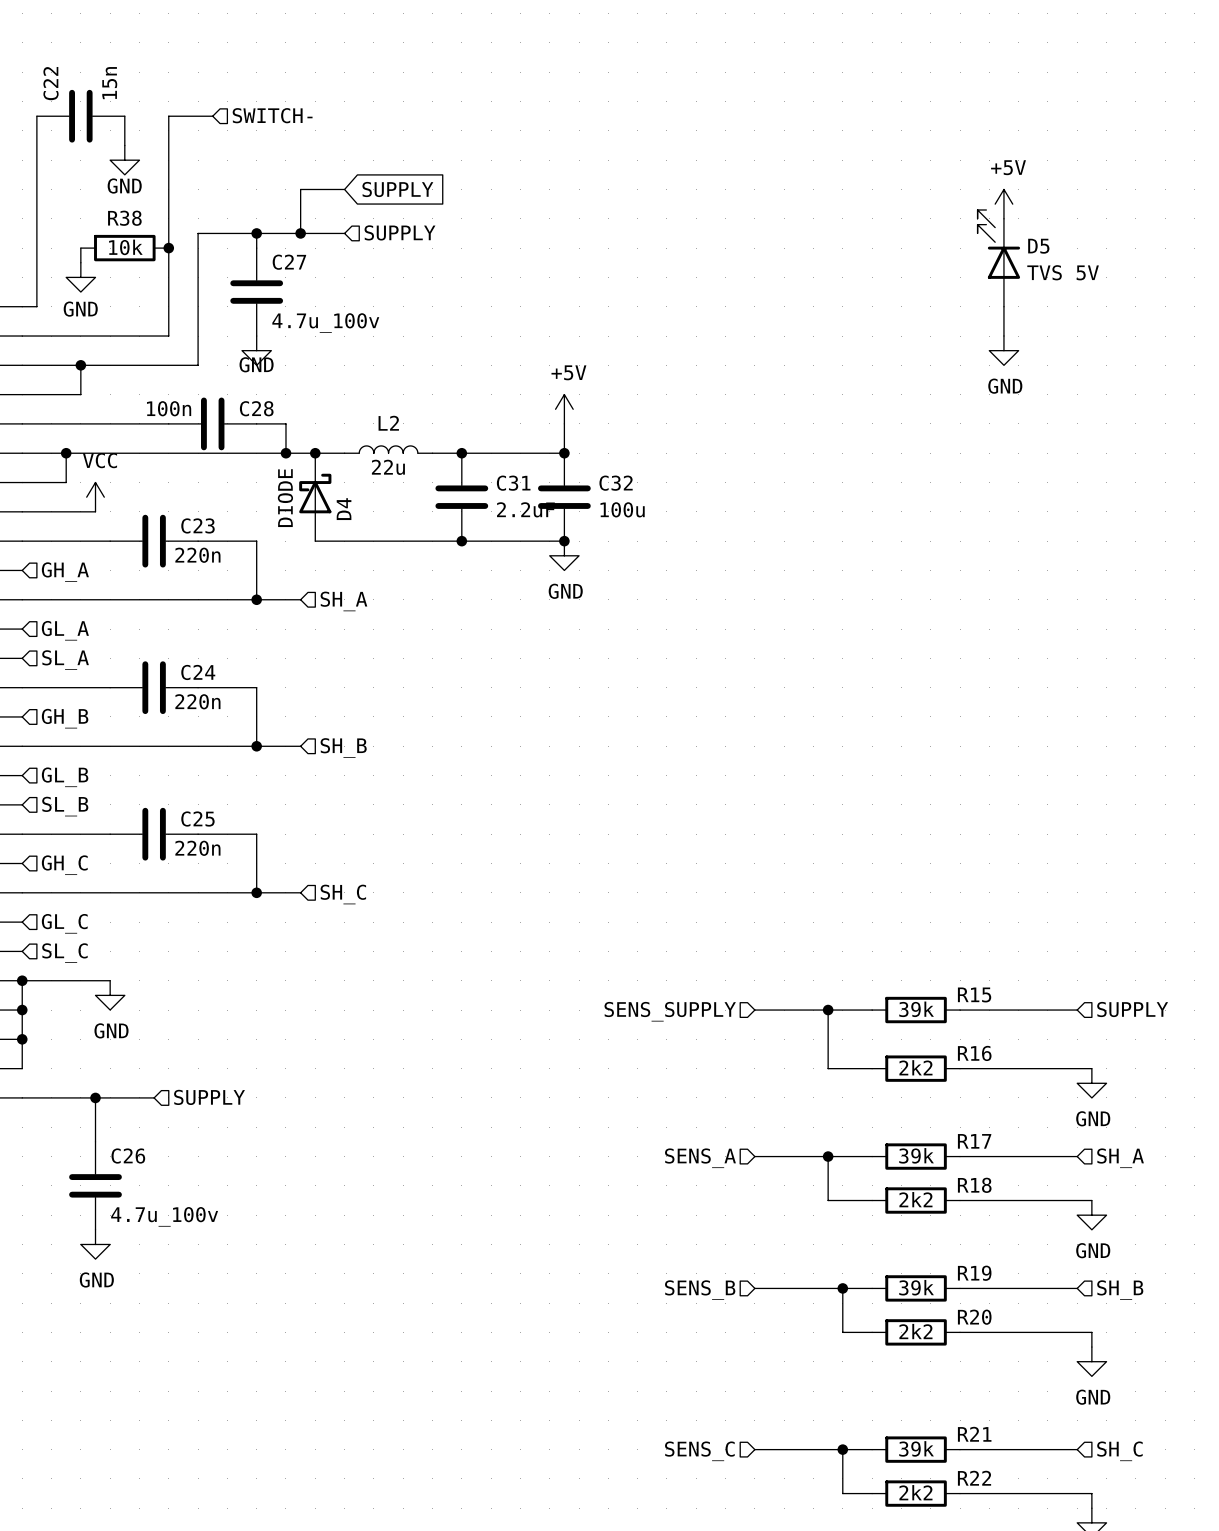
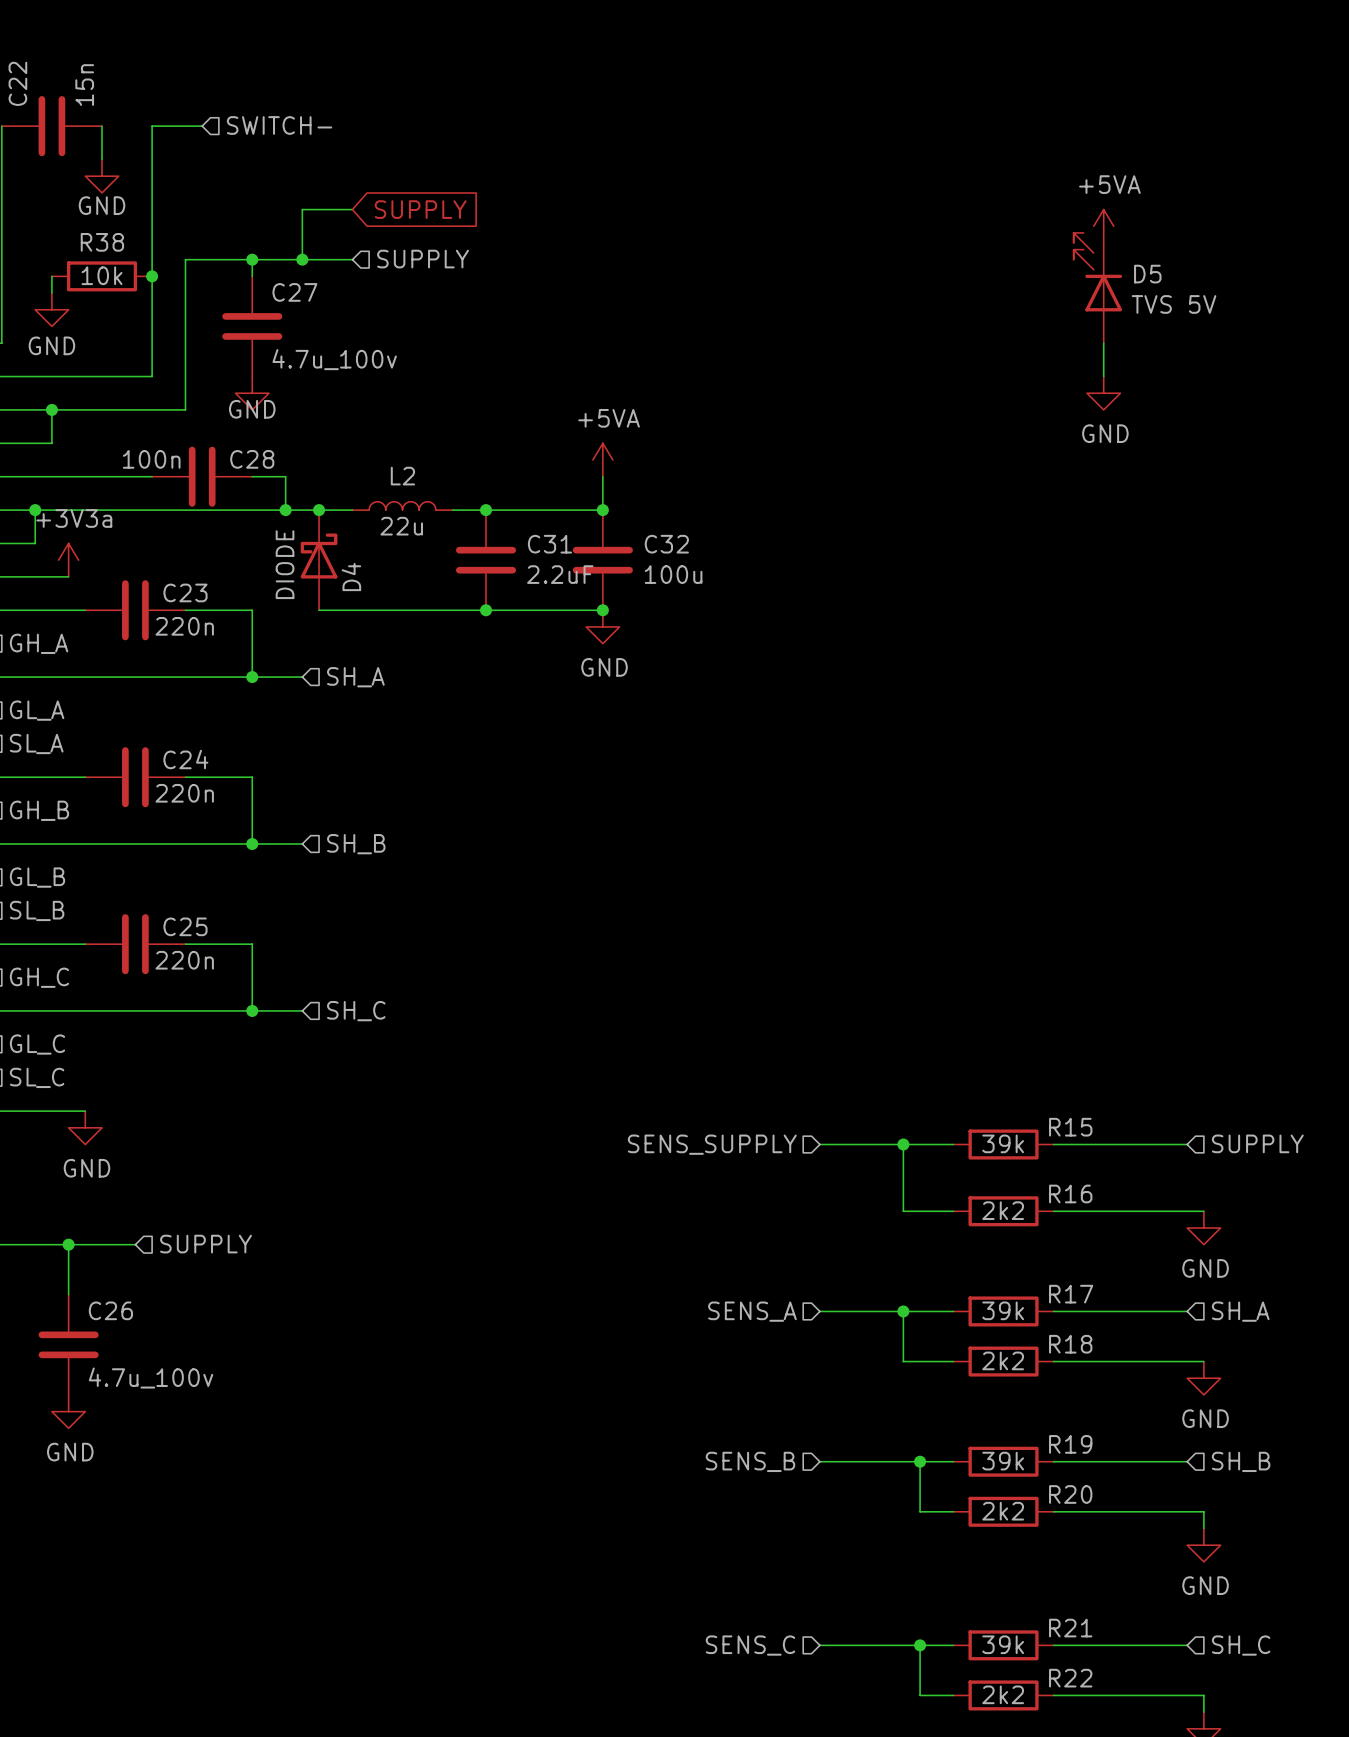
power symbol: +5V (1003, 204) -> +5VA (1103, 226)
power symbol: +5V (564, 409) -> +5VA (602, 460)
power symbol: VCC (95, 497) -> +3V3a (68, 560)

